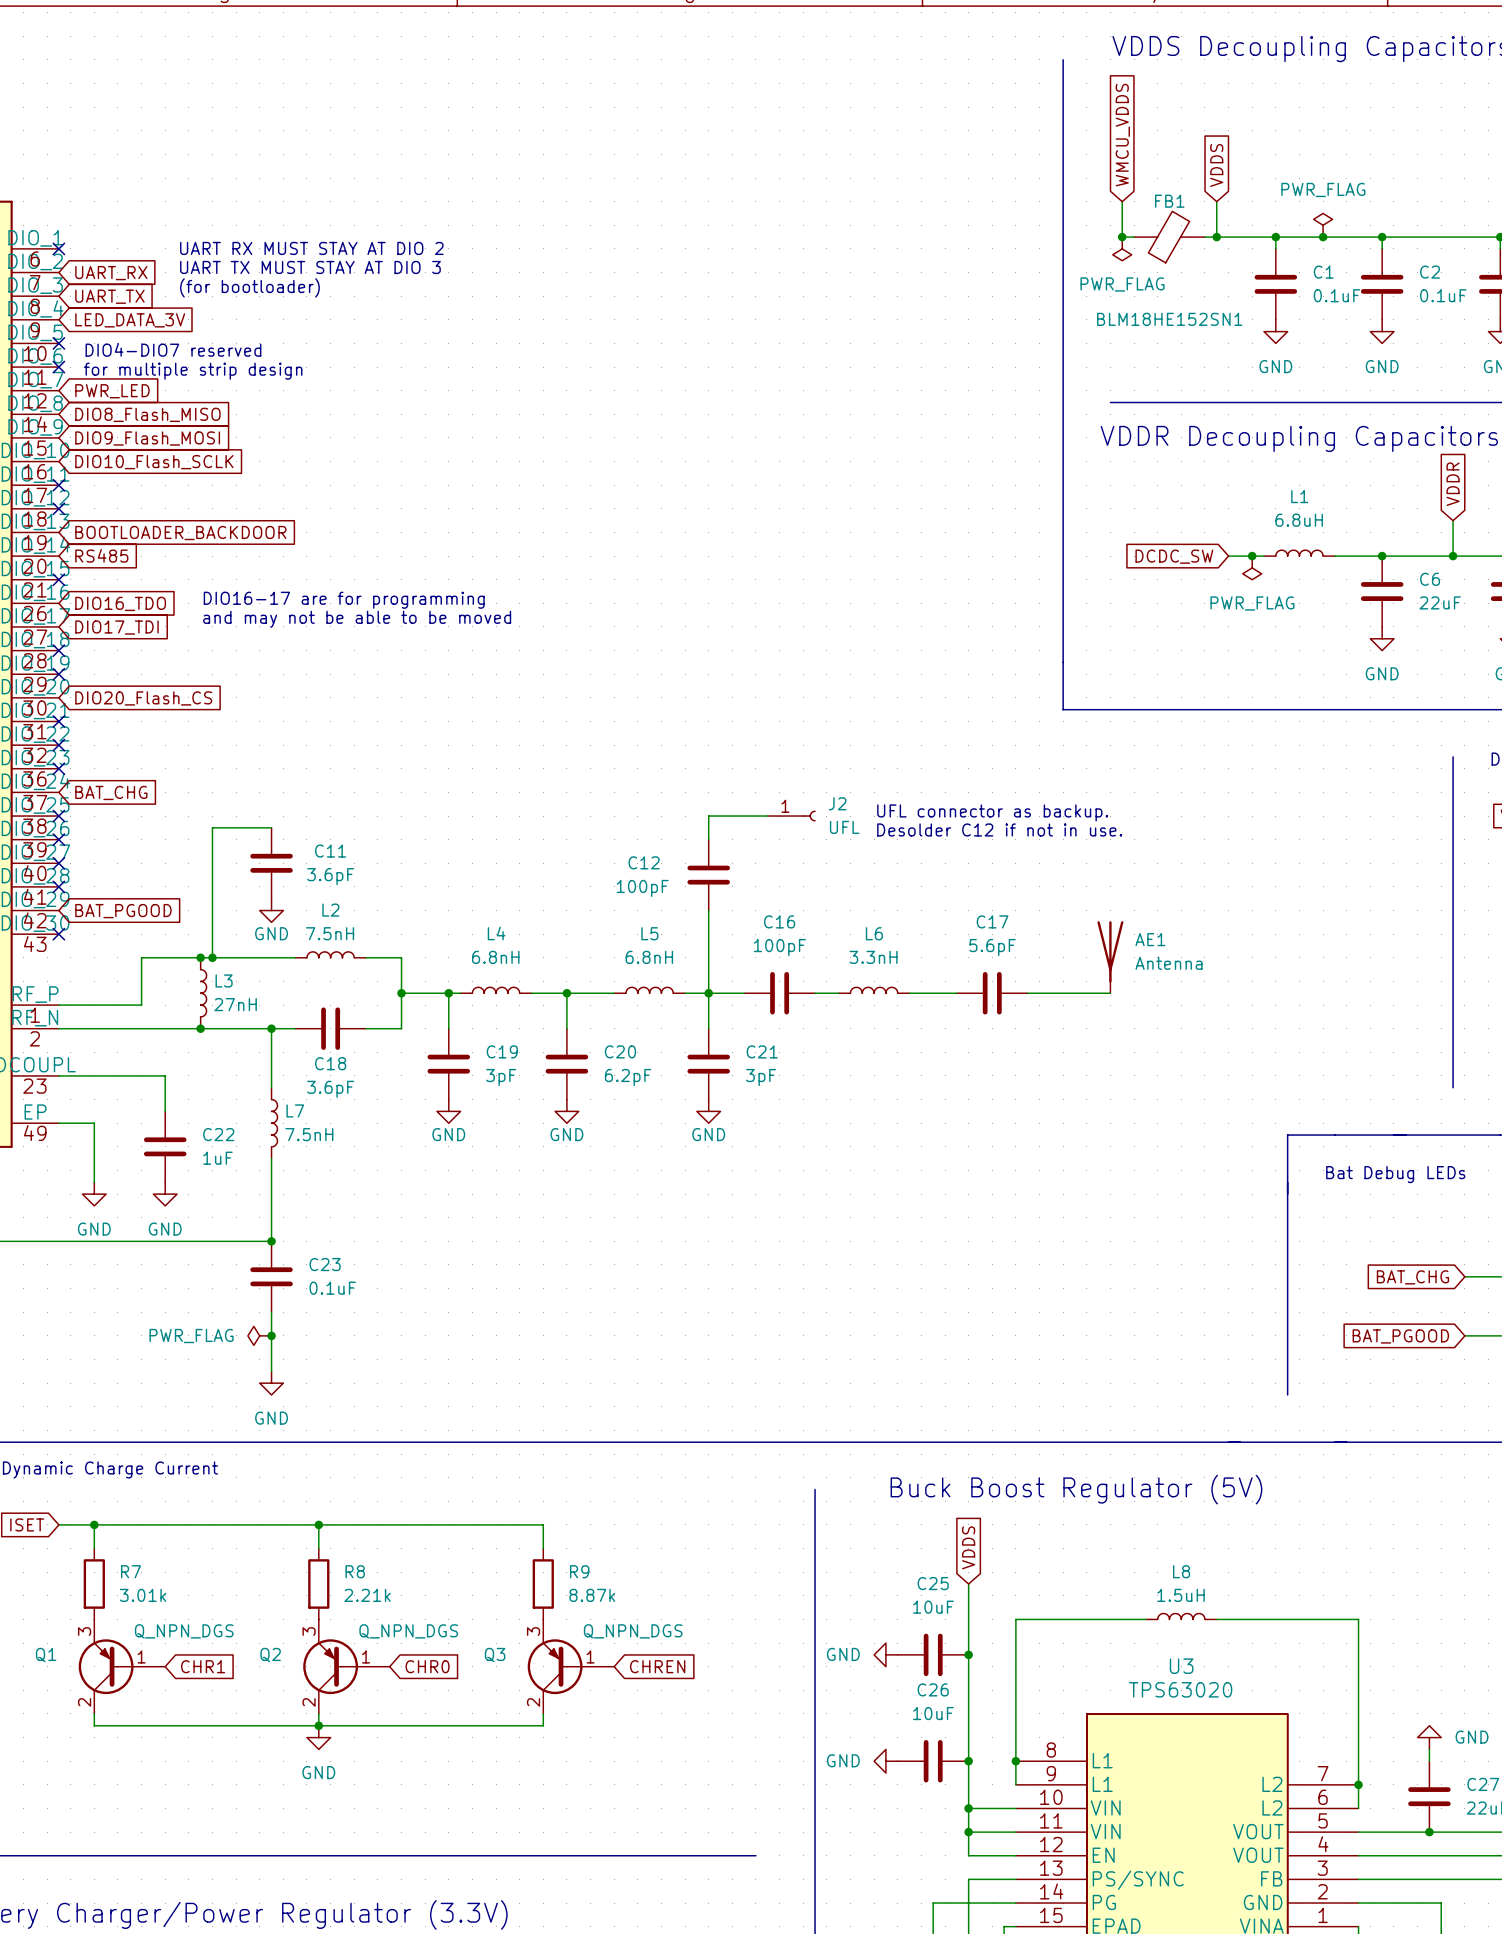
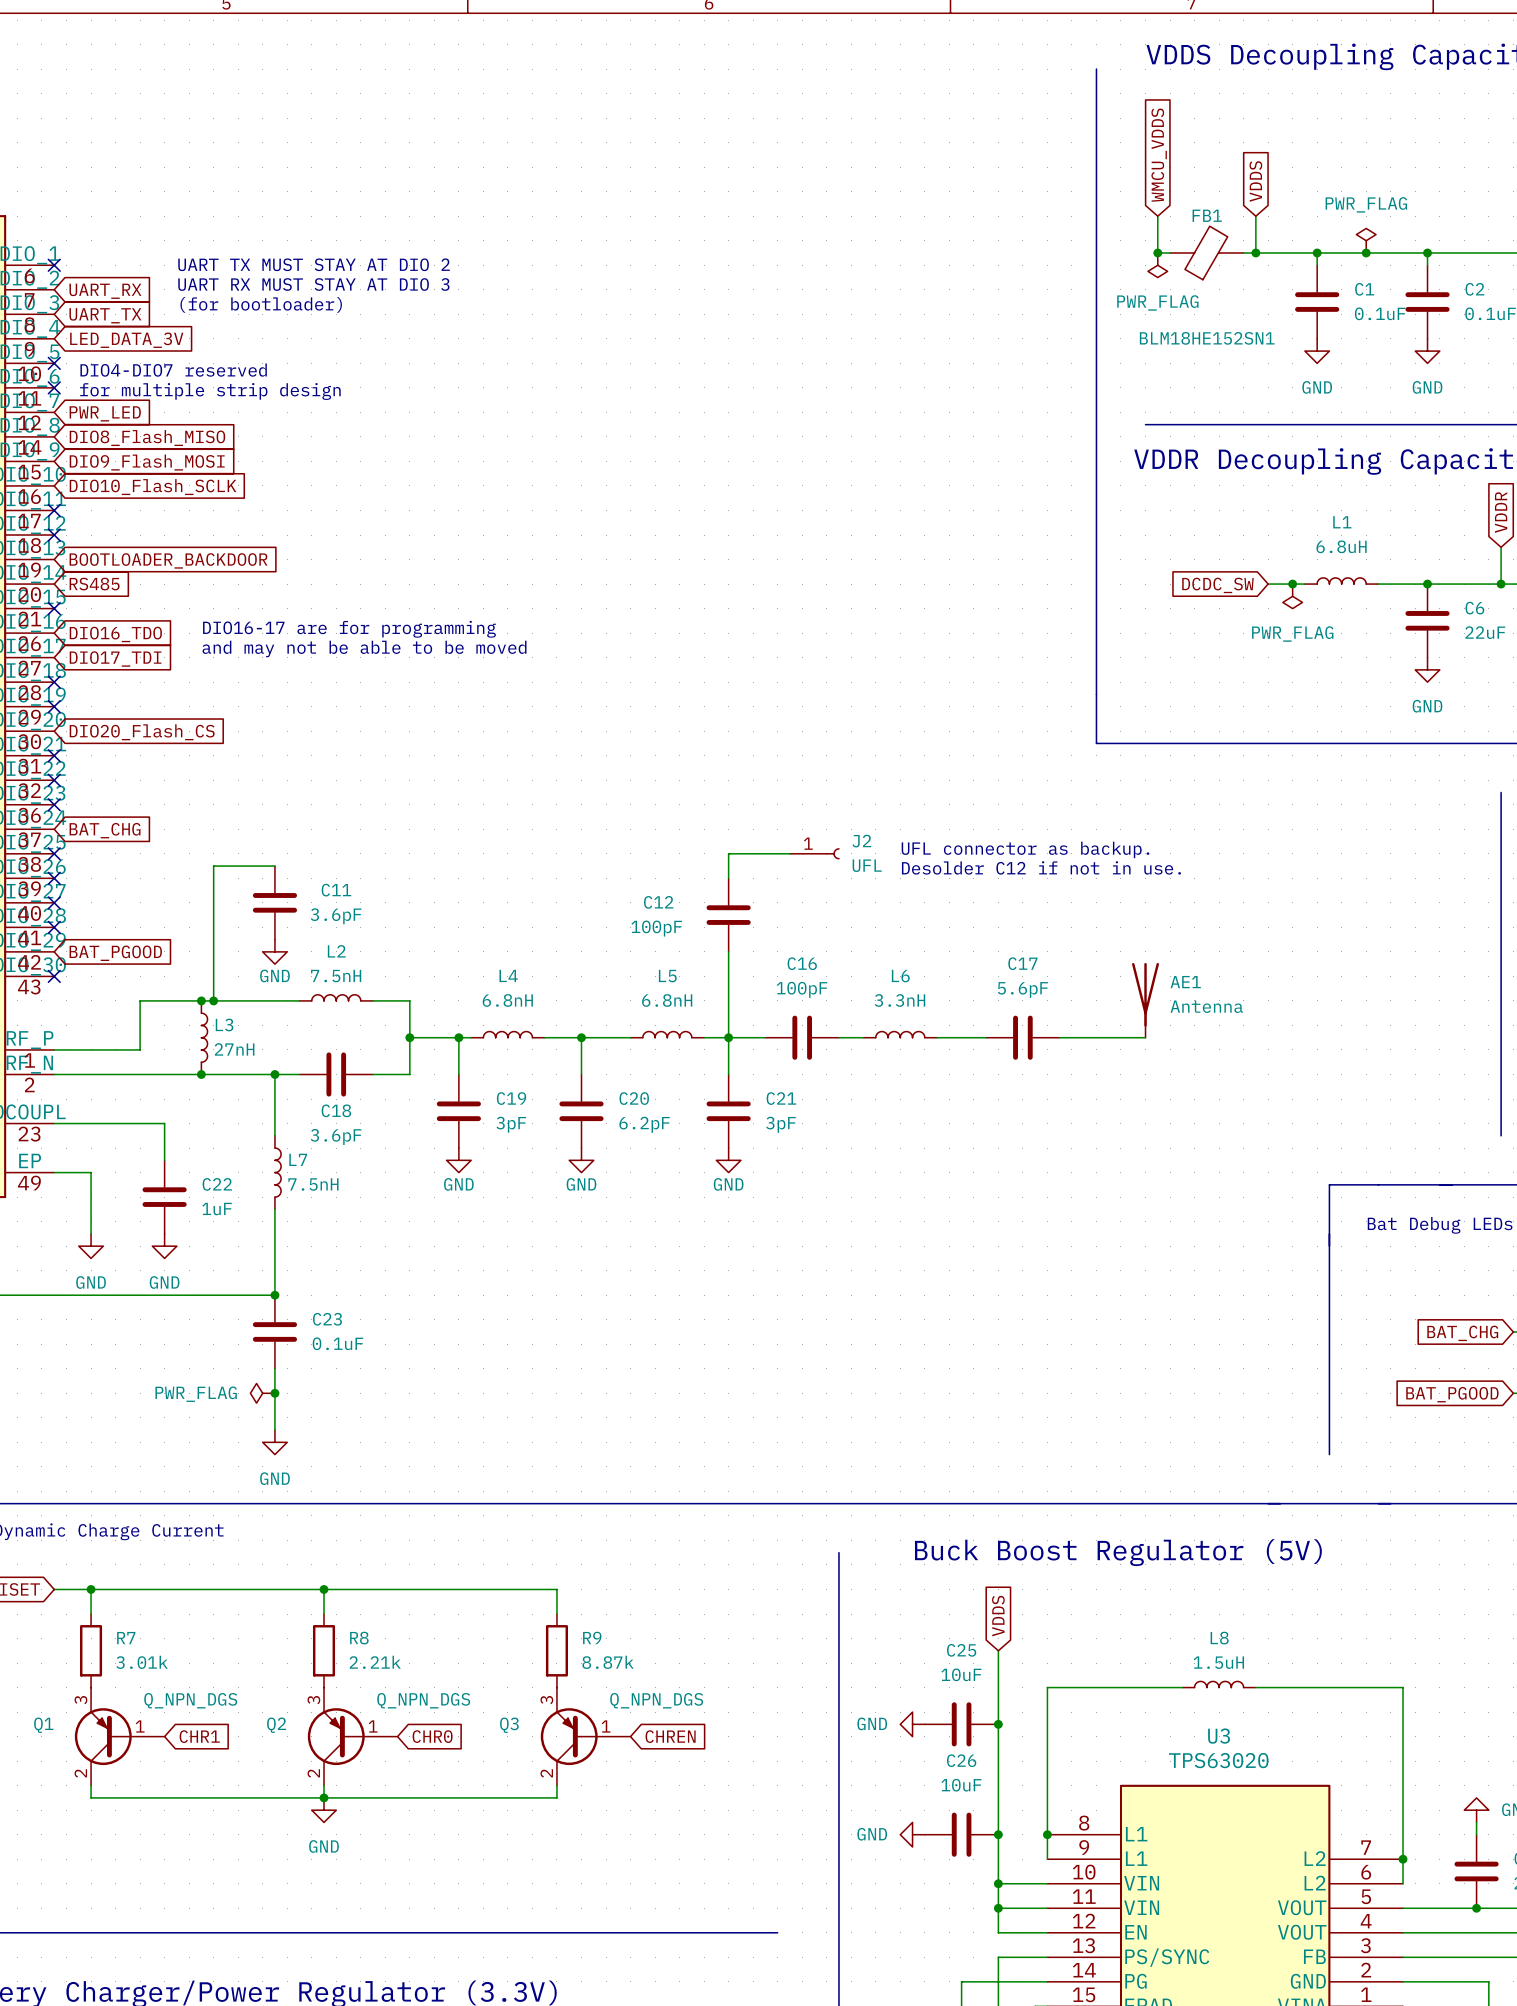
text: UART RX MUST STAY AT DIO 2 (311, 248) -> UART TX MUST STAY AT DIO 2 (314, 264)
text: UART TX MUST STAY AT DIO 3 (310, 267) -> UART RX MUST STAY AT DIO 3 (313, 284)

